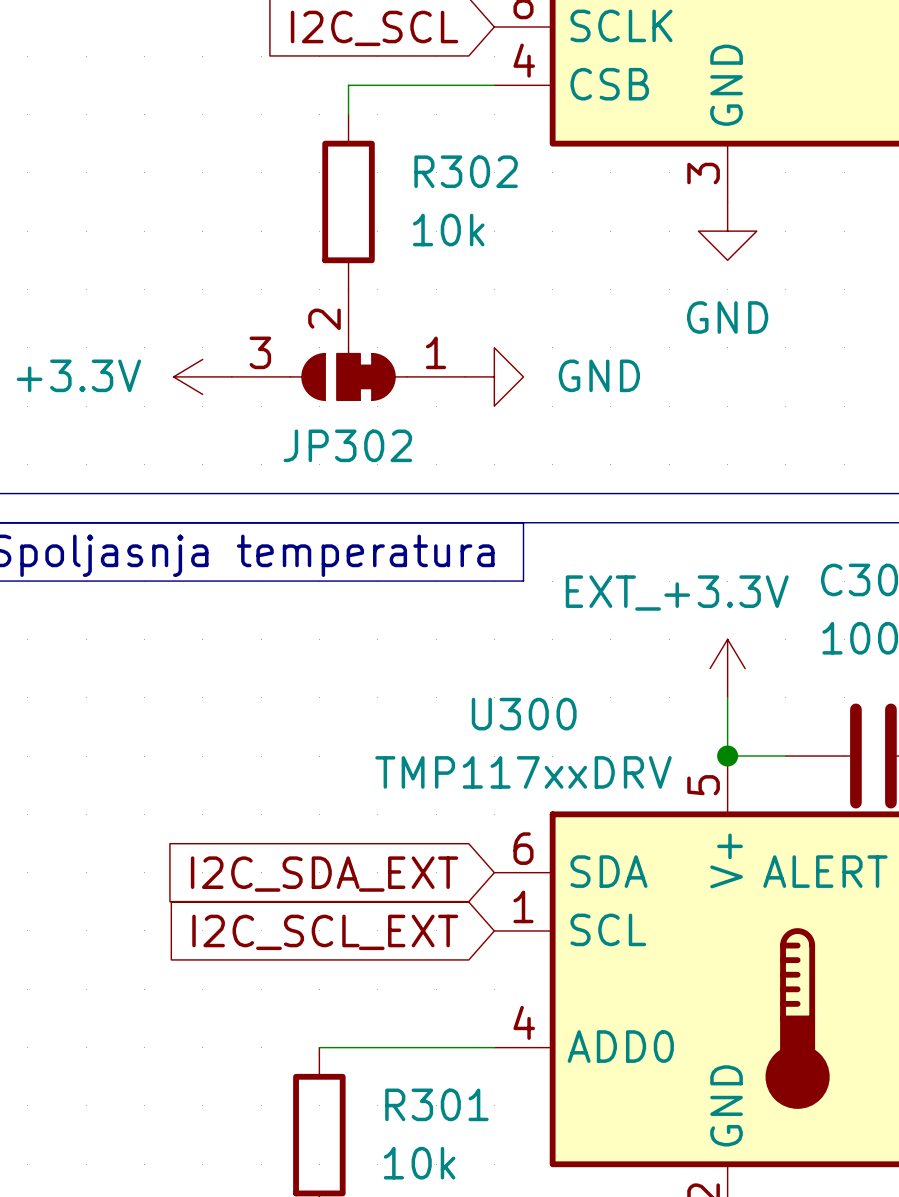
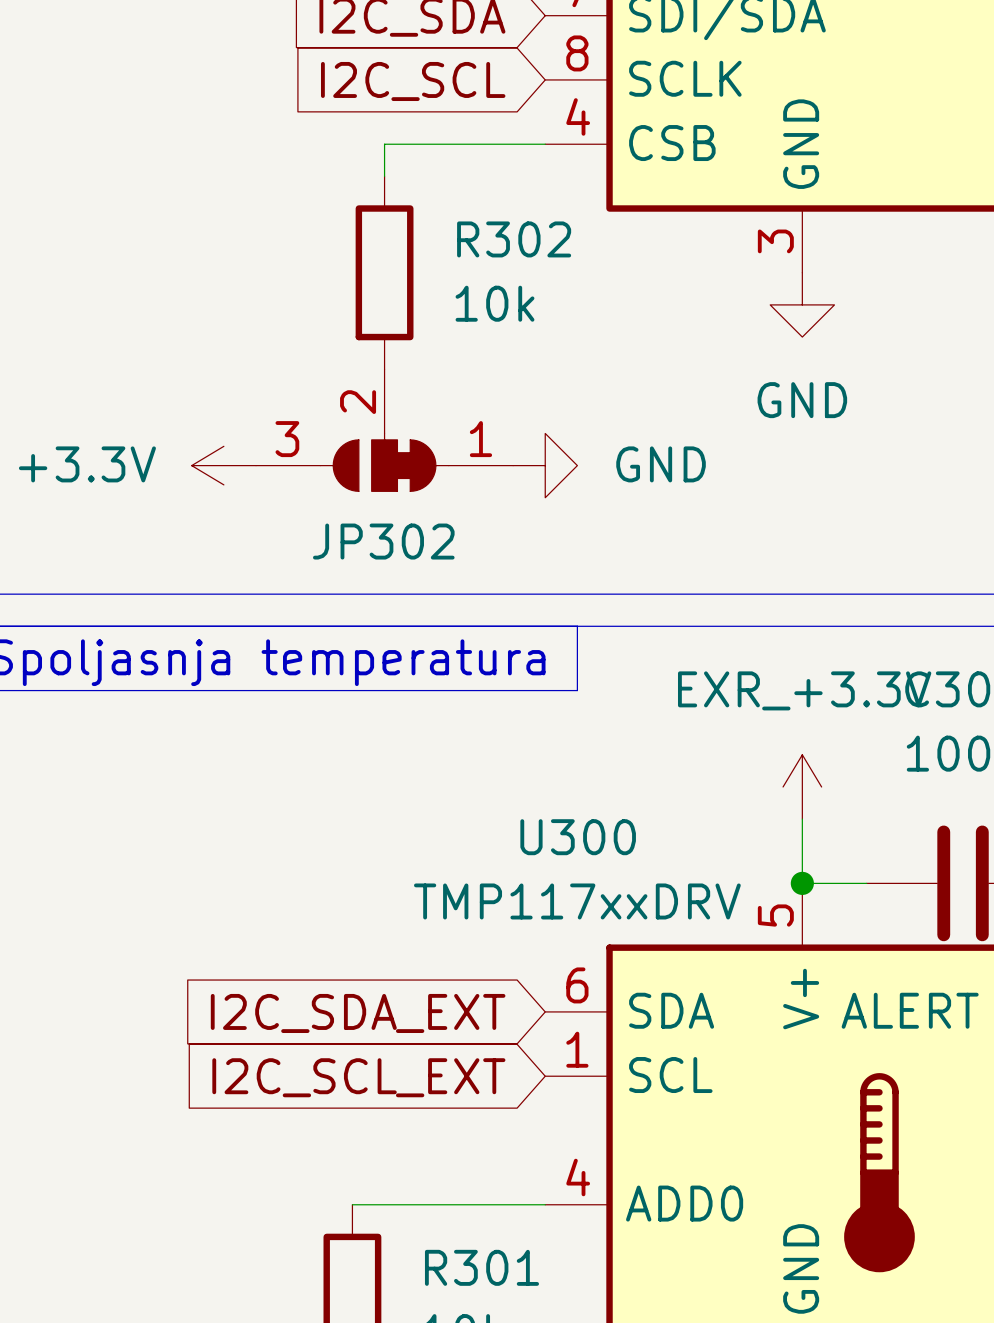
power symbol: EXT_+3.3V (727, 668) -> EXR_+3.3V (802, 786)

